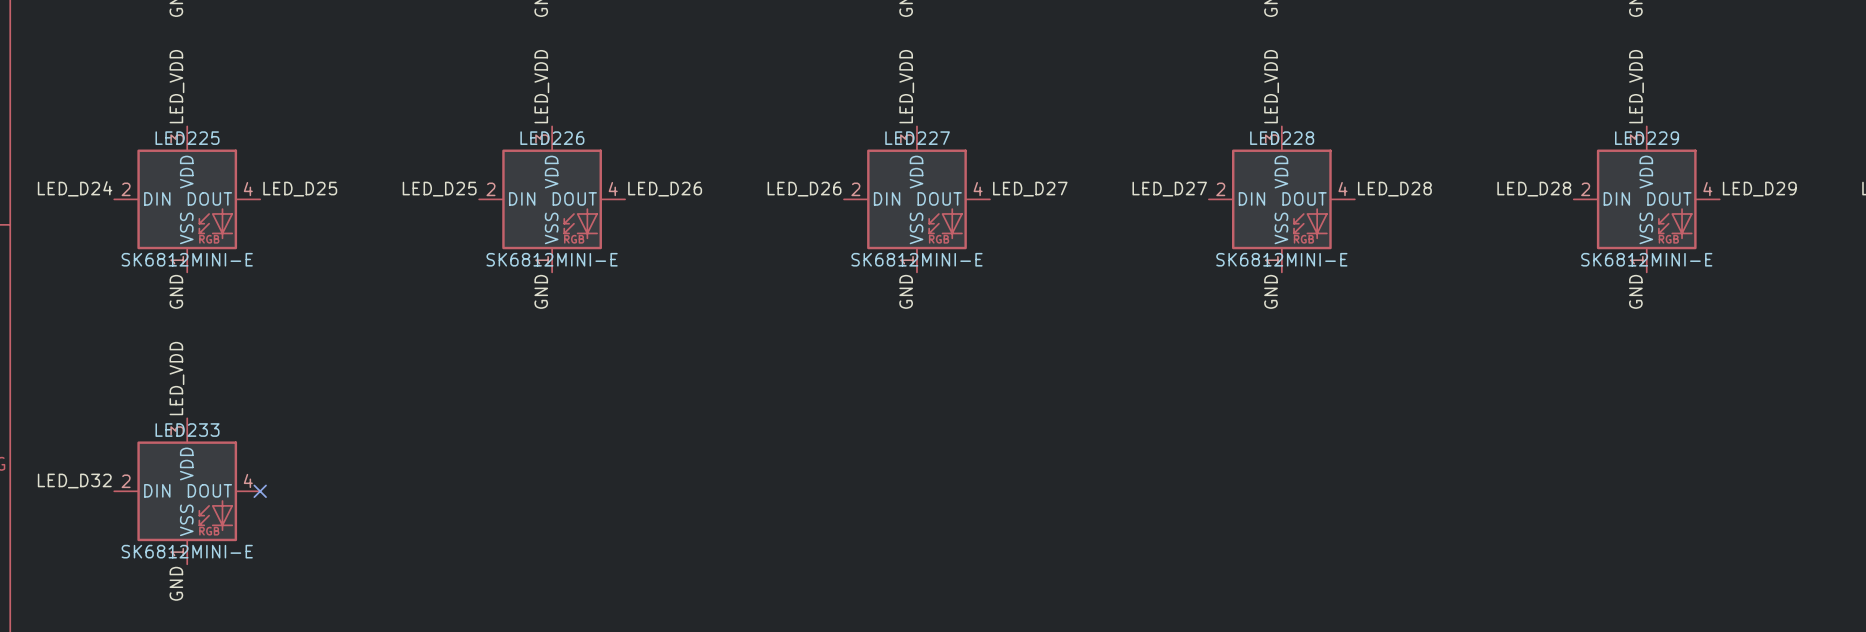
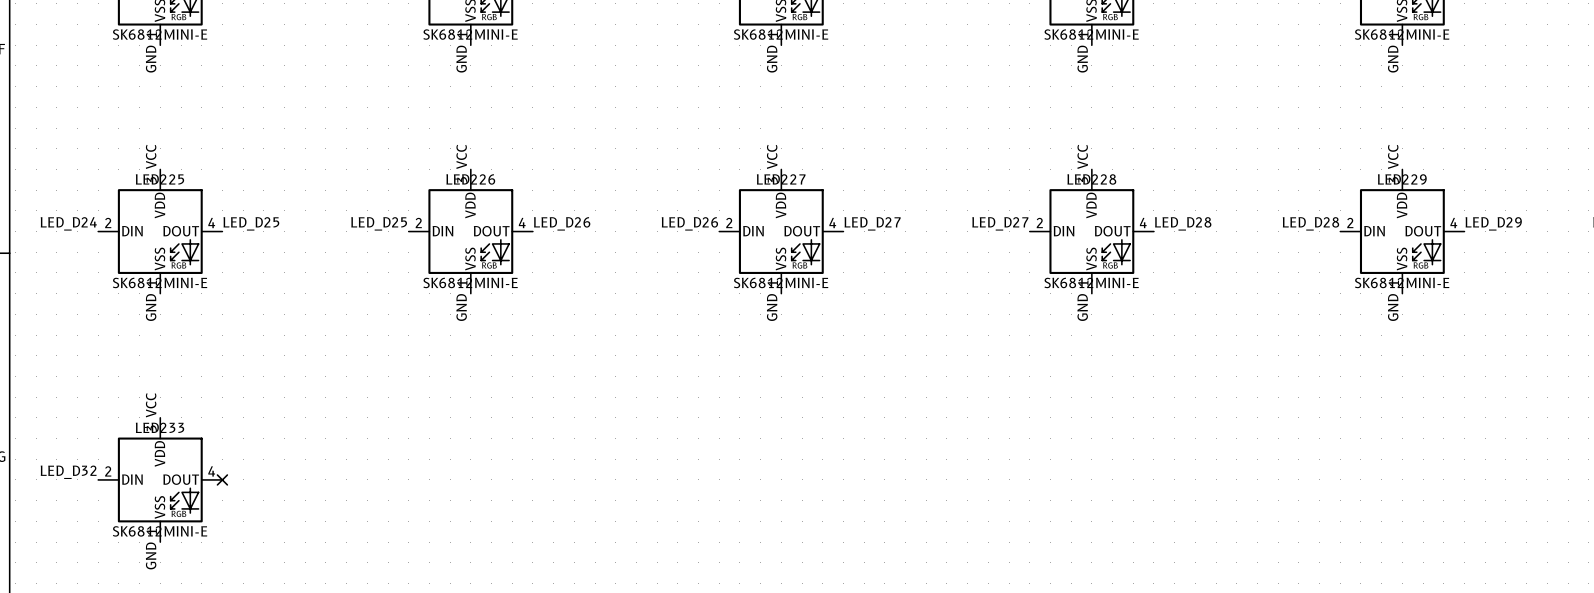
label: LED_VDD (176, 86) -> VCC (151, 156)
label: LED_VDD (541, 86) -> VCC (461, 156)
label: LED_VDD (906, 86) -> VCC (772, 156)
label: LED_VDD (1271, 86) -> VCC (1082, 156)
label: LED_VDD (1636, 86) -> VCC (1393, 156)
label: LED_VDD (176, 378) -> VCC (151, 405)

